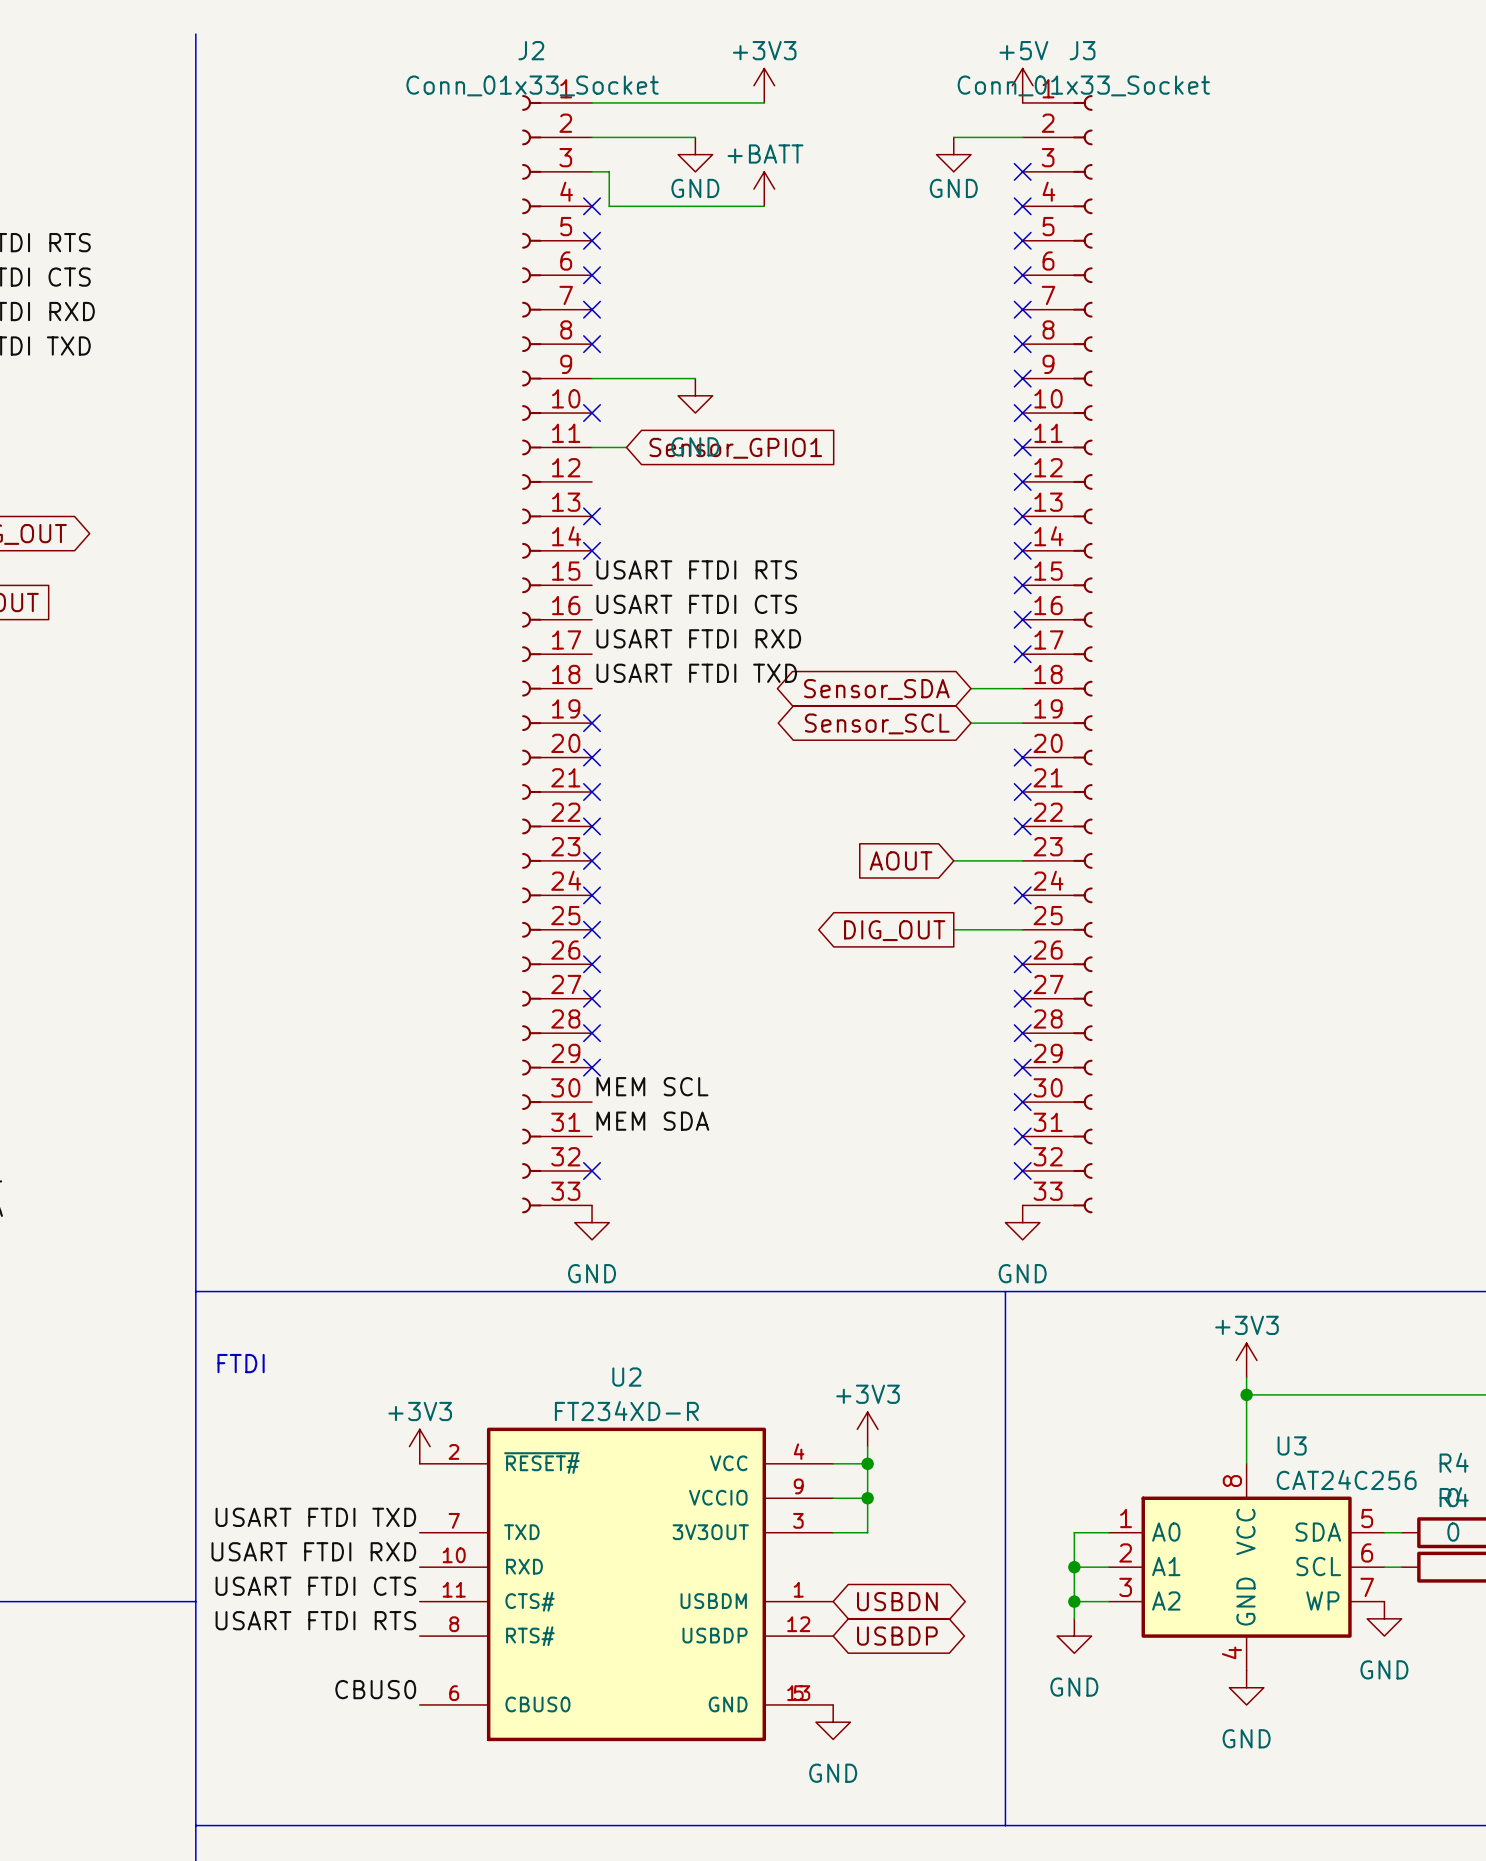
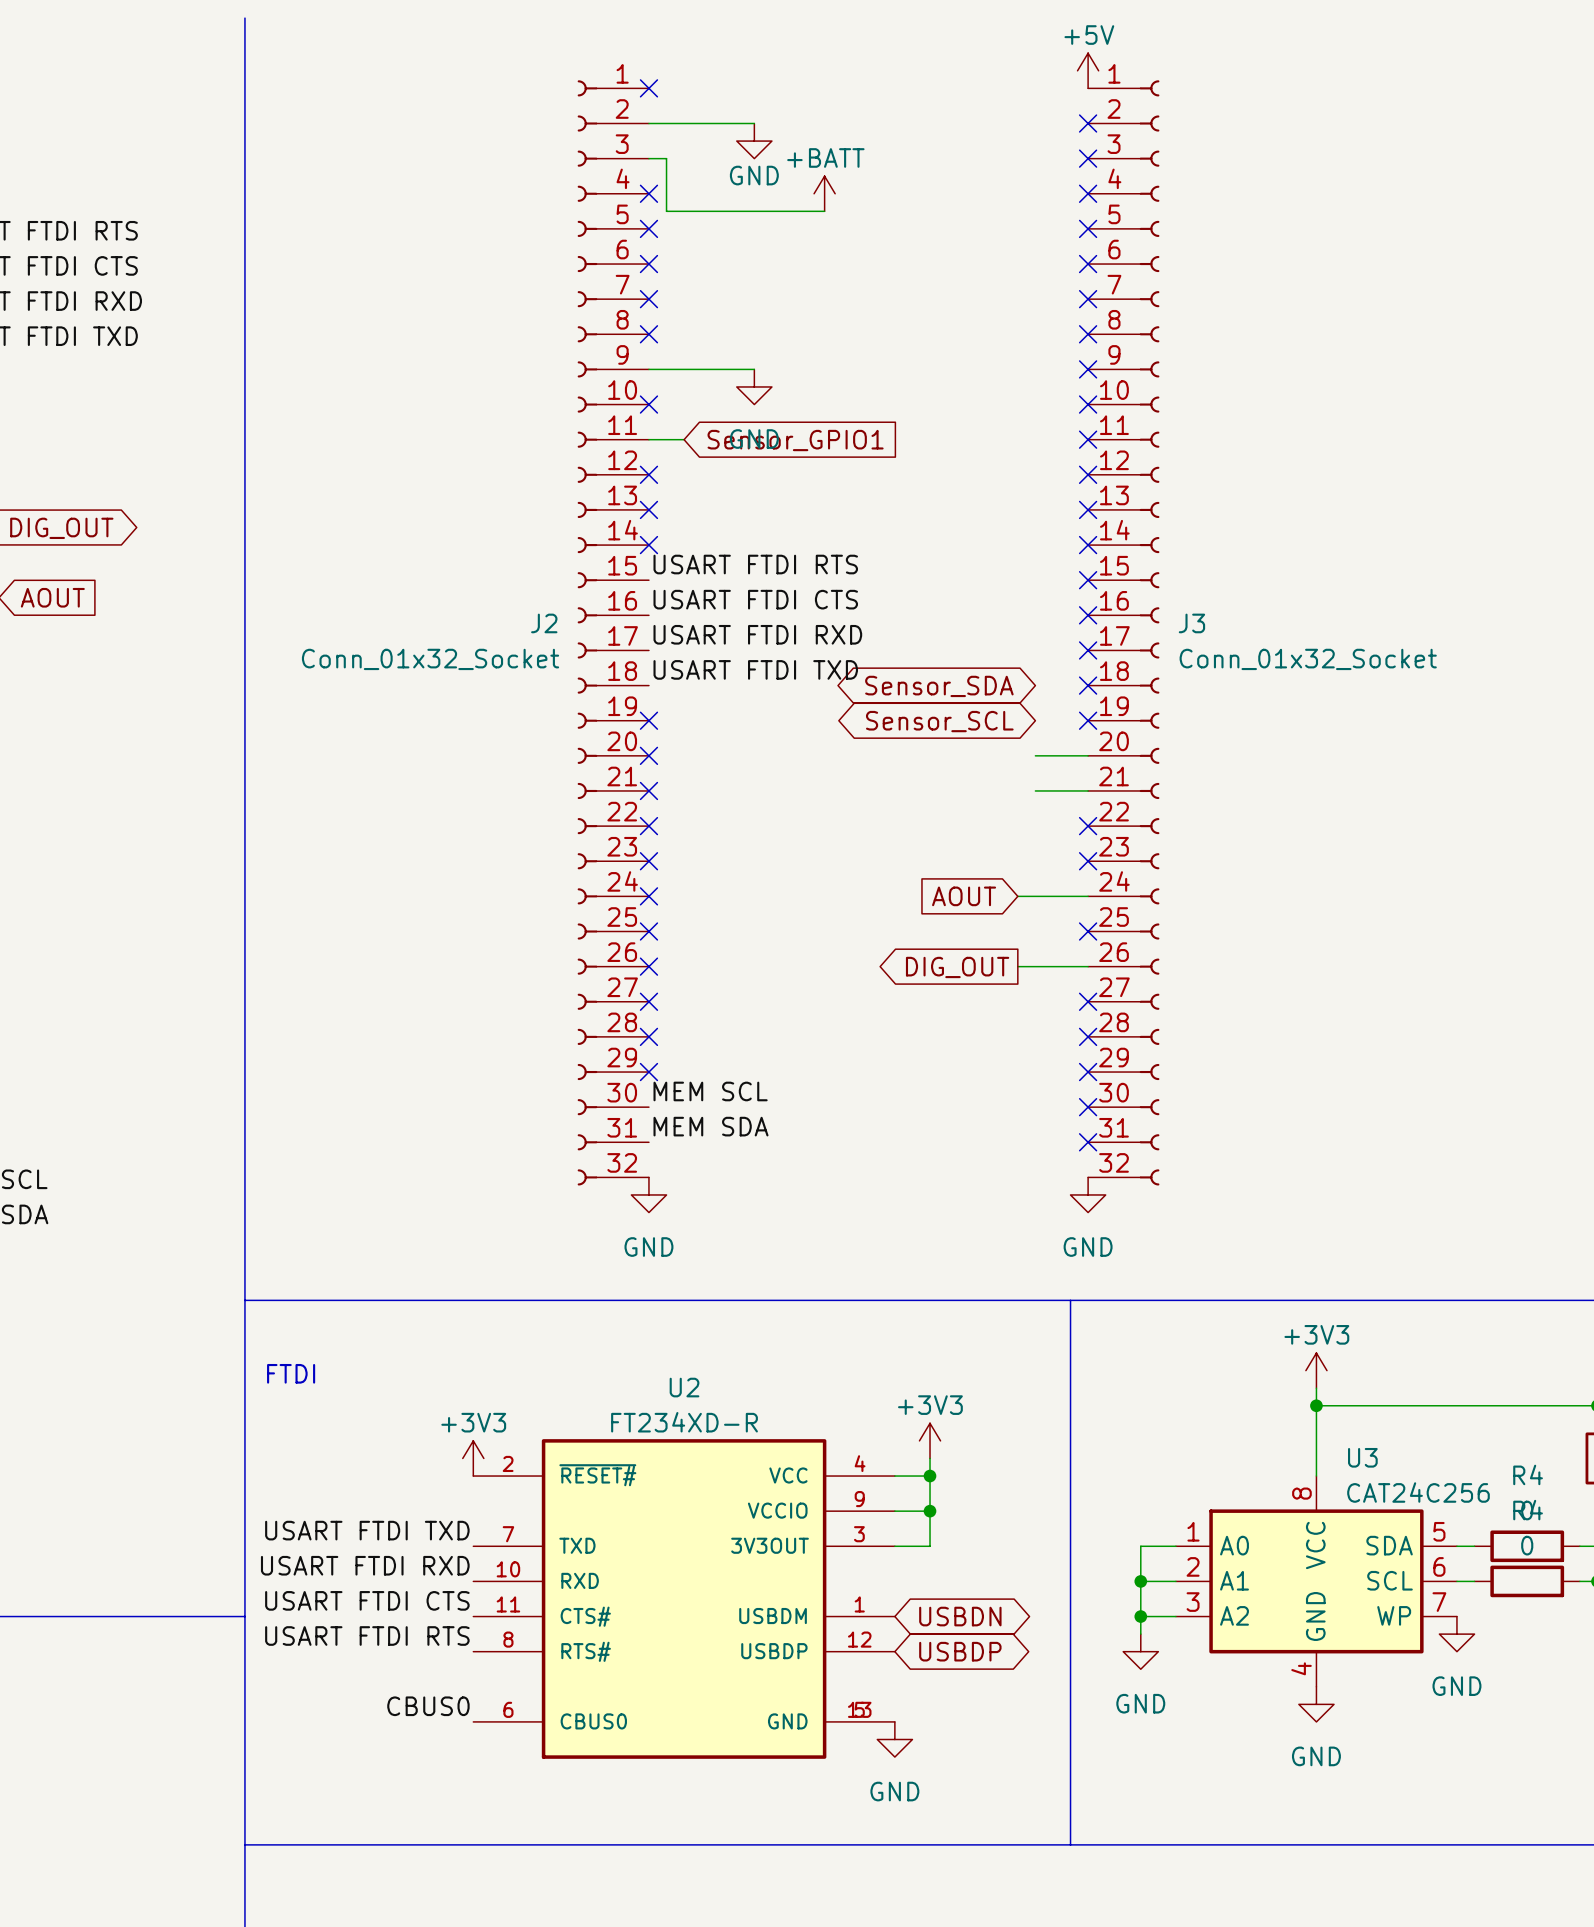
J2 name position: J2 (531, 50) -> J2 (544, 623)
J3 name position: J3 (1082, 50) -> J3 (1191, 623)
J2 value: Conn_01x33_Socket (532, 85) -> Conn_01x32_Socket (430, 659)
power symbol: +3V3 (764, 85) -> none
J3 value: Conn_01x33_Socket (1083, 85) -> Conn_01x32_Socket (1308, 659)
J2 symbol: [522, 95, 593, 1214] -> [577, 80, 649, 1186]
J3 symbol: [1022, 95, 1093, 1214] -> [1088, 80, 1160, 1186]
wire: (592, 102) (764, 102) -> none
no-connect mark: none -> (648, 88)
wire: (953, 137) (1022, 137) -> none
no-connect mark: none -> (1088, 123)
power symbol: GND (953, 154) -> none
power symbol position: +BATT (764, 189) -> +BATT (824, 193)
wire: (609, 206) (764, 206) -> (666, 193) (666, 211) (824, 211)
no-connect mark: none -> (648, 474)
wire: (970, 688) (1022, 688) -> (1035, 790) (1088, 790)
no-connect mark: none -> (1088, 685)
wire: (970, 723) (1022, 723) -> (1035, 755) (1088, 755)
no-connect mark: none -> (1088, 720)
no-connect mark: (1022, 757) -> none
no-connect mark: (1022, 792) -> none
global label position: AOUT (901, 860) -> AOUT (964, 896)
wire: (953, 860) (1022, 860) -> (1017, 896) (1088, 896)
no-connect mark: none -> (1088, 861)
no-connect mark: (1022, 895) -> none
wire: (953, 929) (1022, 929) -> (1017, 966) (1088, 966)
no-connect mark: none -> (1088, 931)
global label position: DIG_OUT (894, 930) -> DIG_OUT (957, 967)
no-connect mark: (1022, 964) -> none
no-connect mark: (592, 1170) -> none
no-connect mark: (1022, 1170) -> none
power symbol position: GND (592, 1222) -> GND (648, 1194)
power symbol position: GND (1022, 1222) -> GND (1088, 1194)

